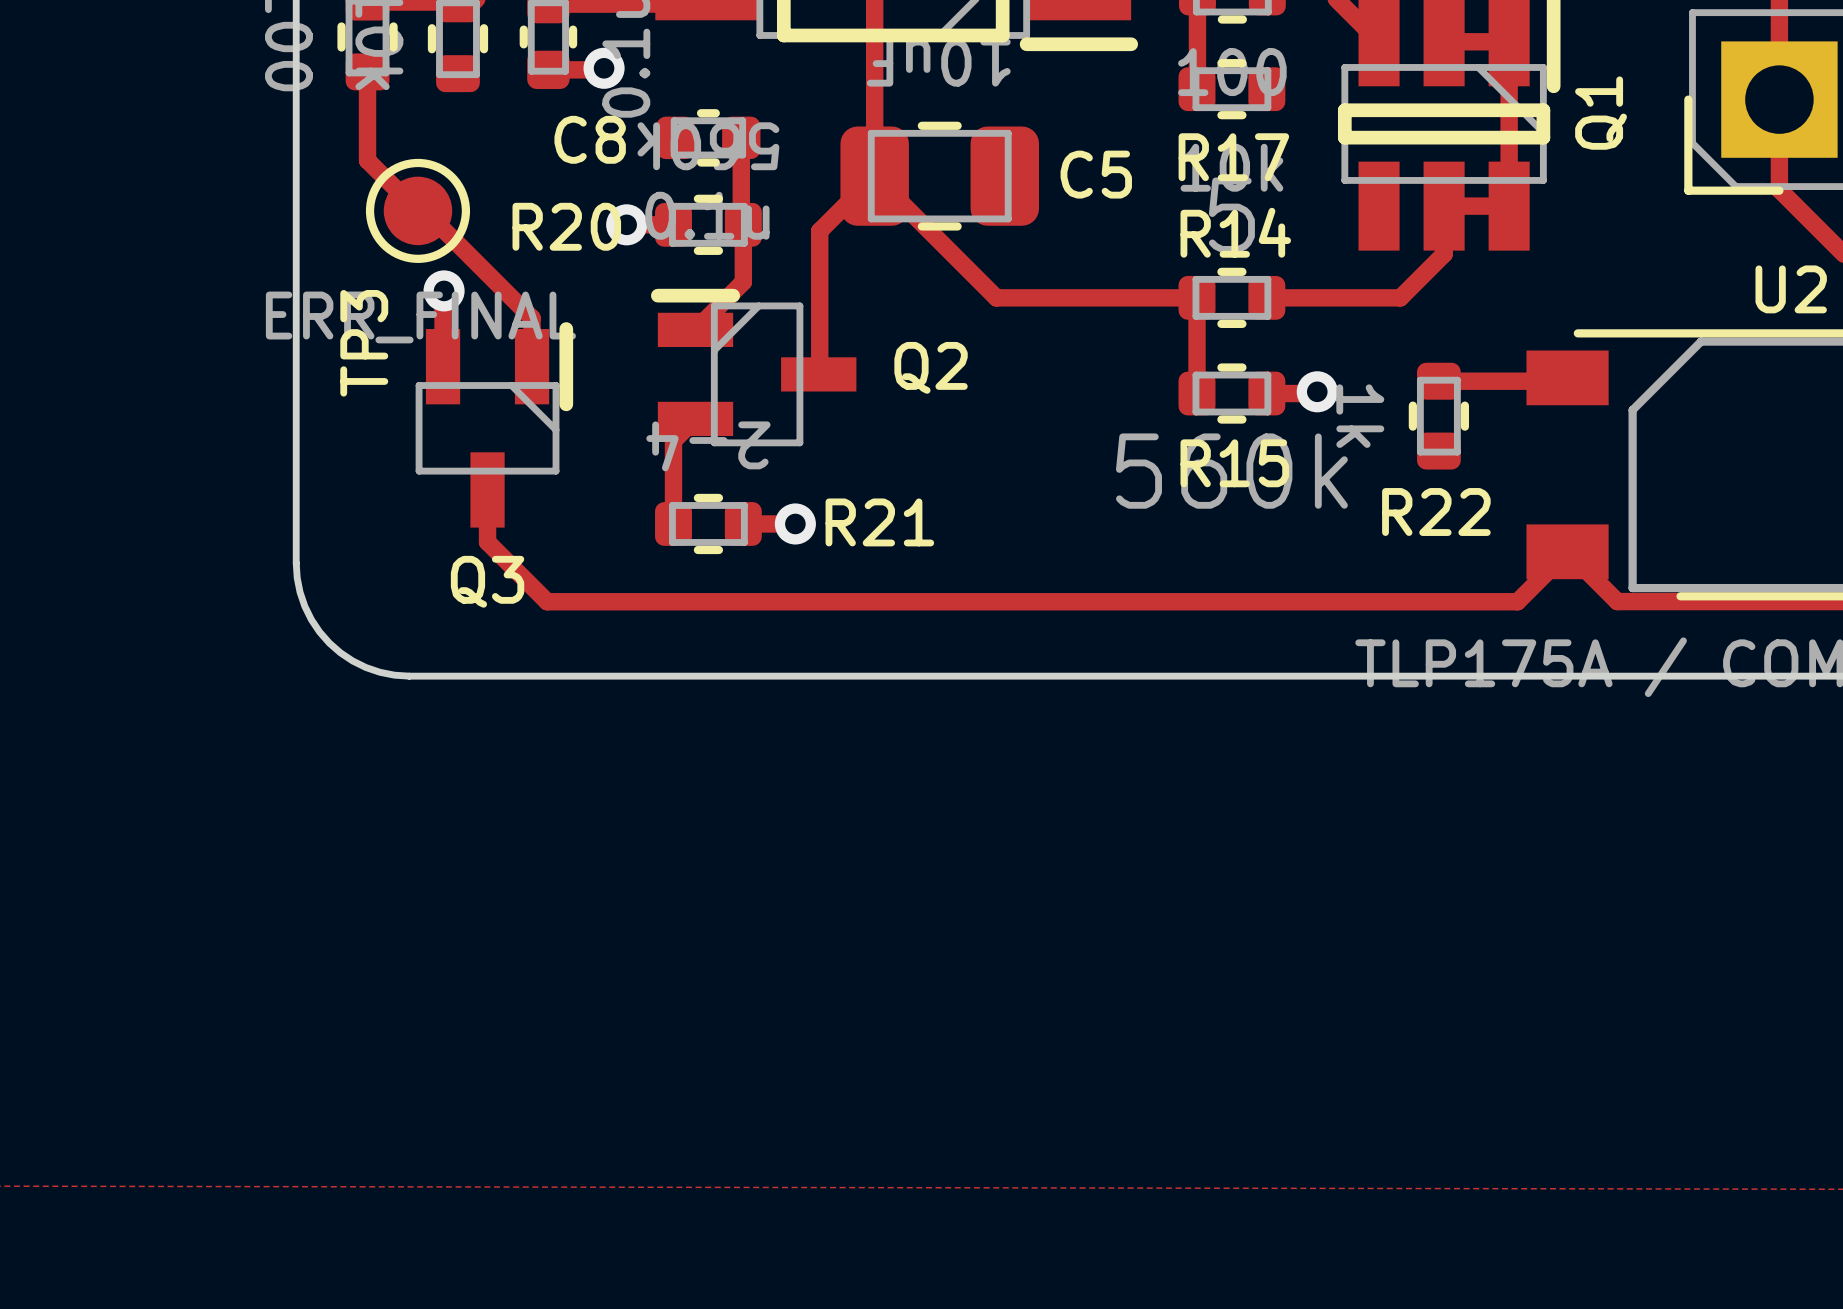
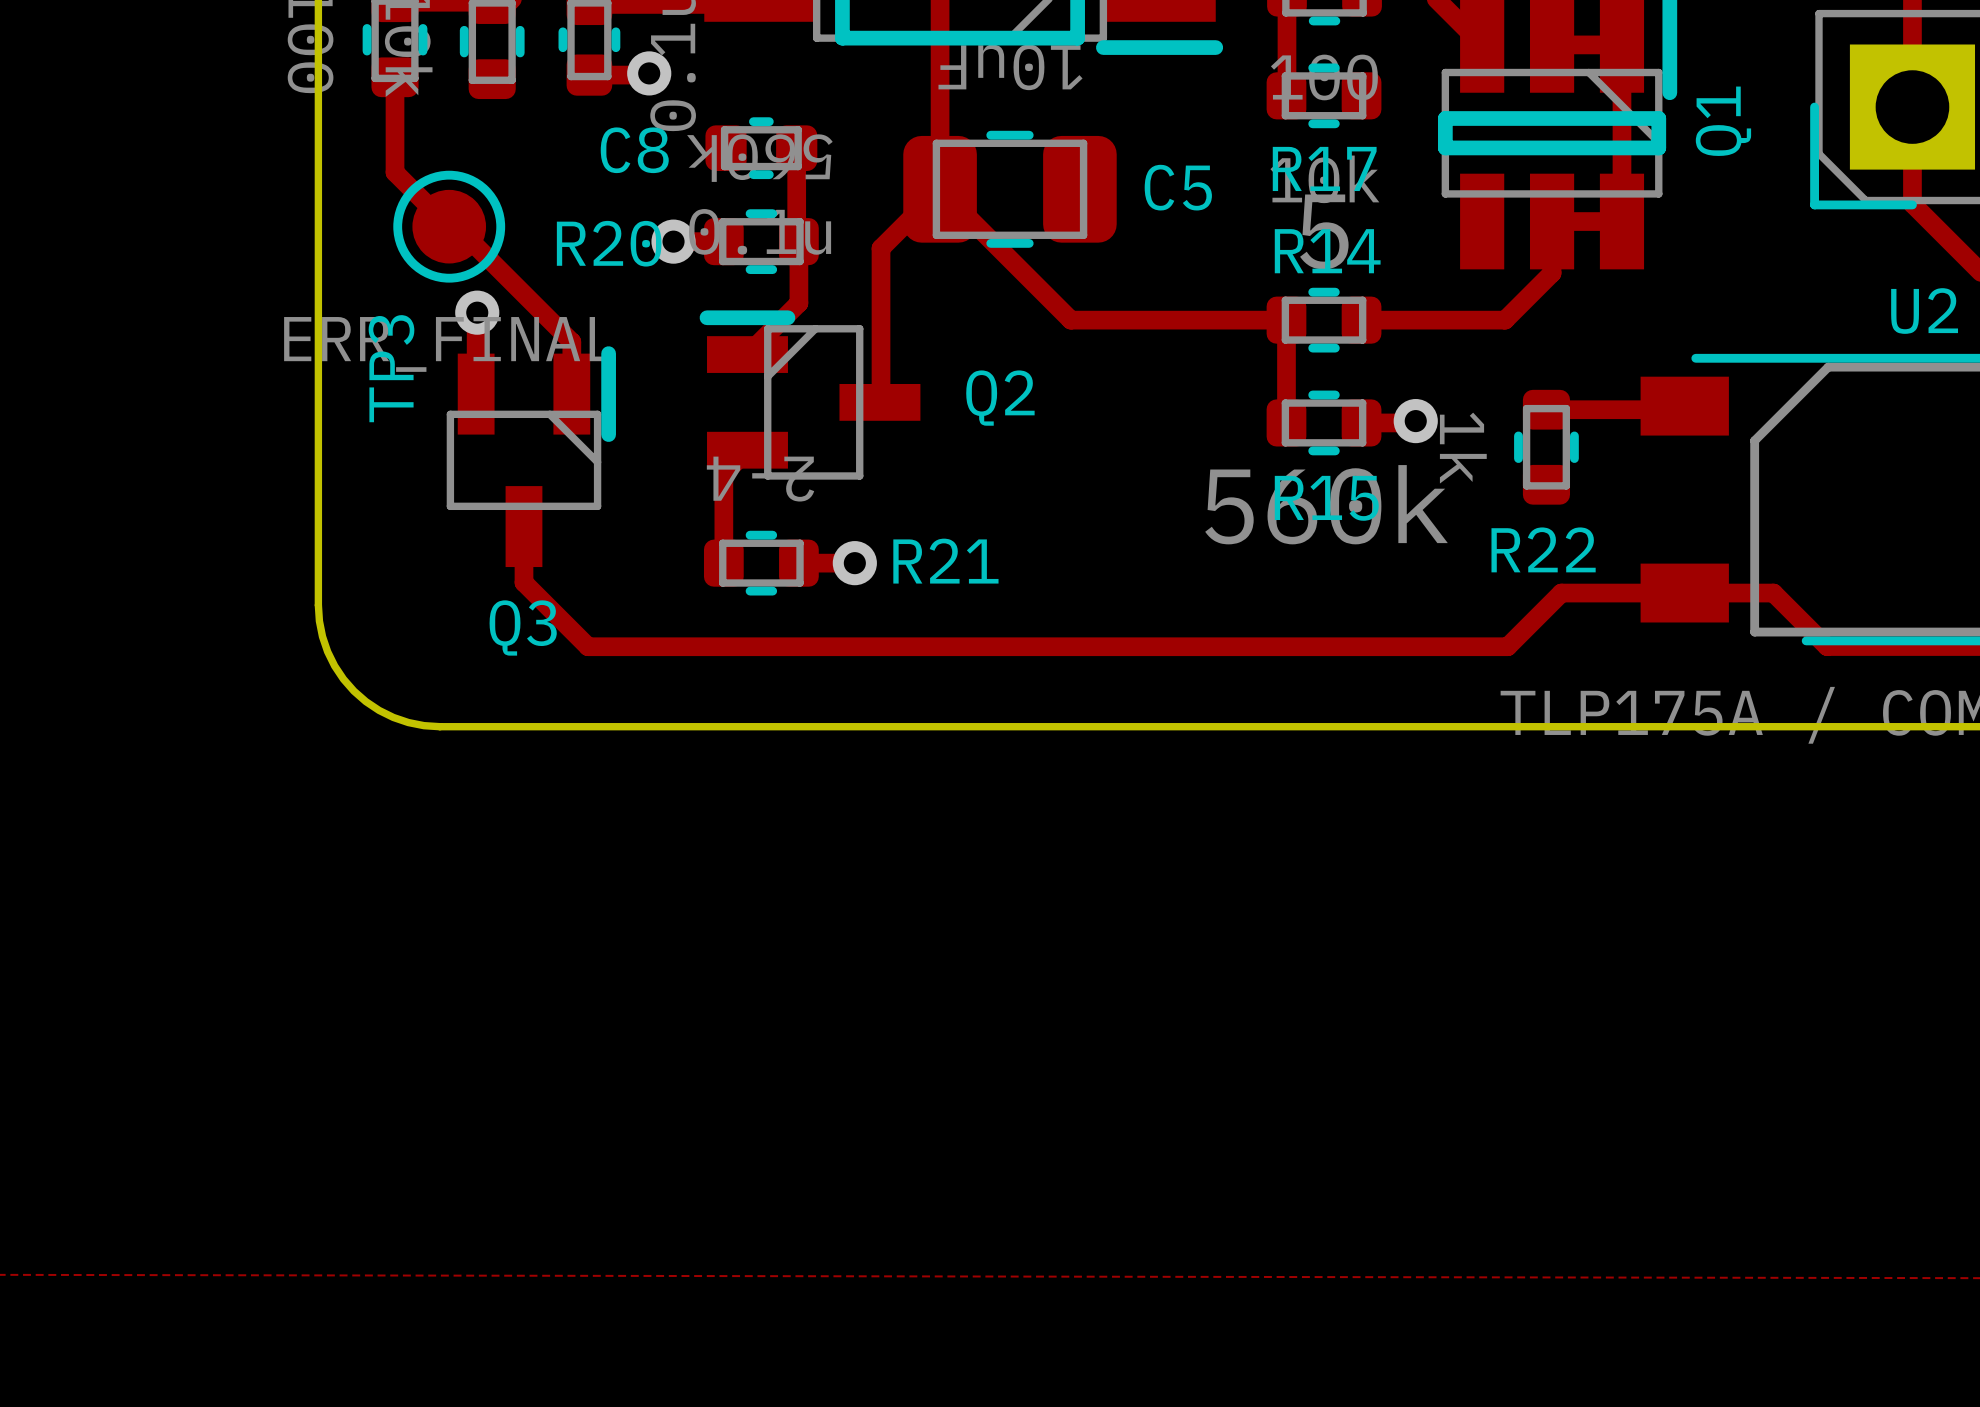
track: (1699, 601) (1617, 601) (1567, 551) (1517, 601) (1402, 601) -> (1827, 646) (1773, 593) (1561, 593) (1507, 646)

